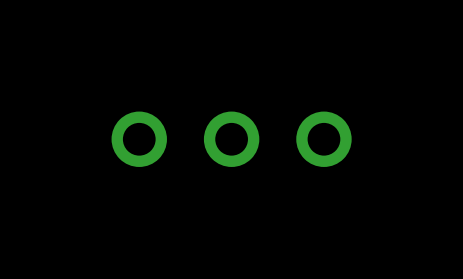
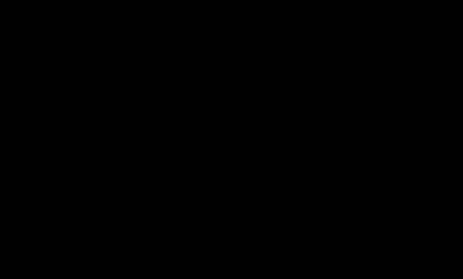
part: (231, 139) -> none

